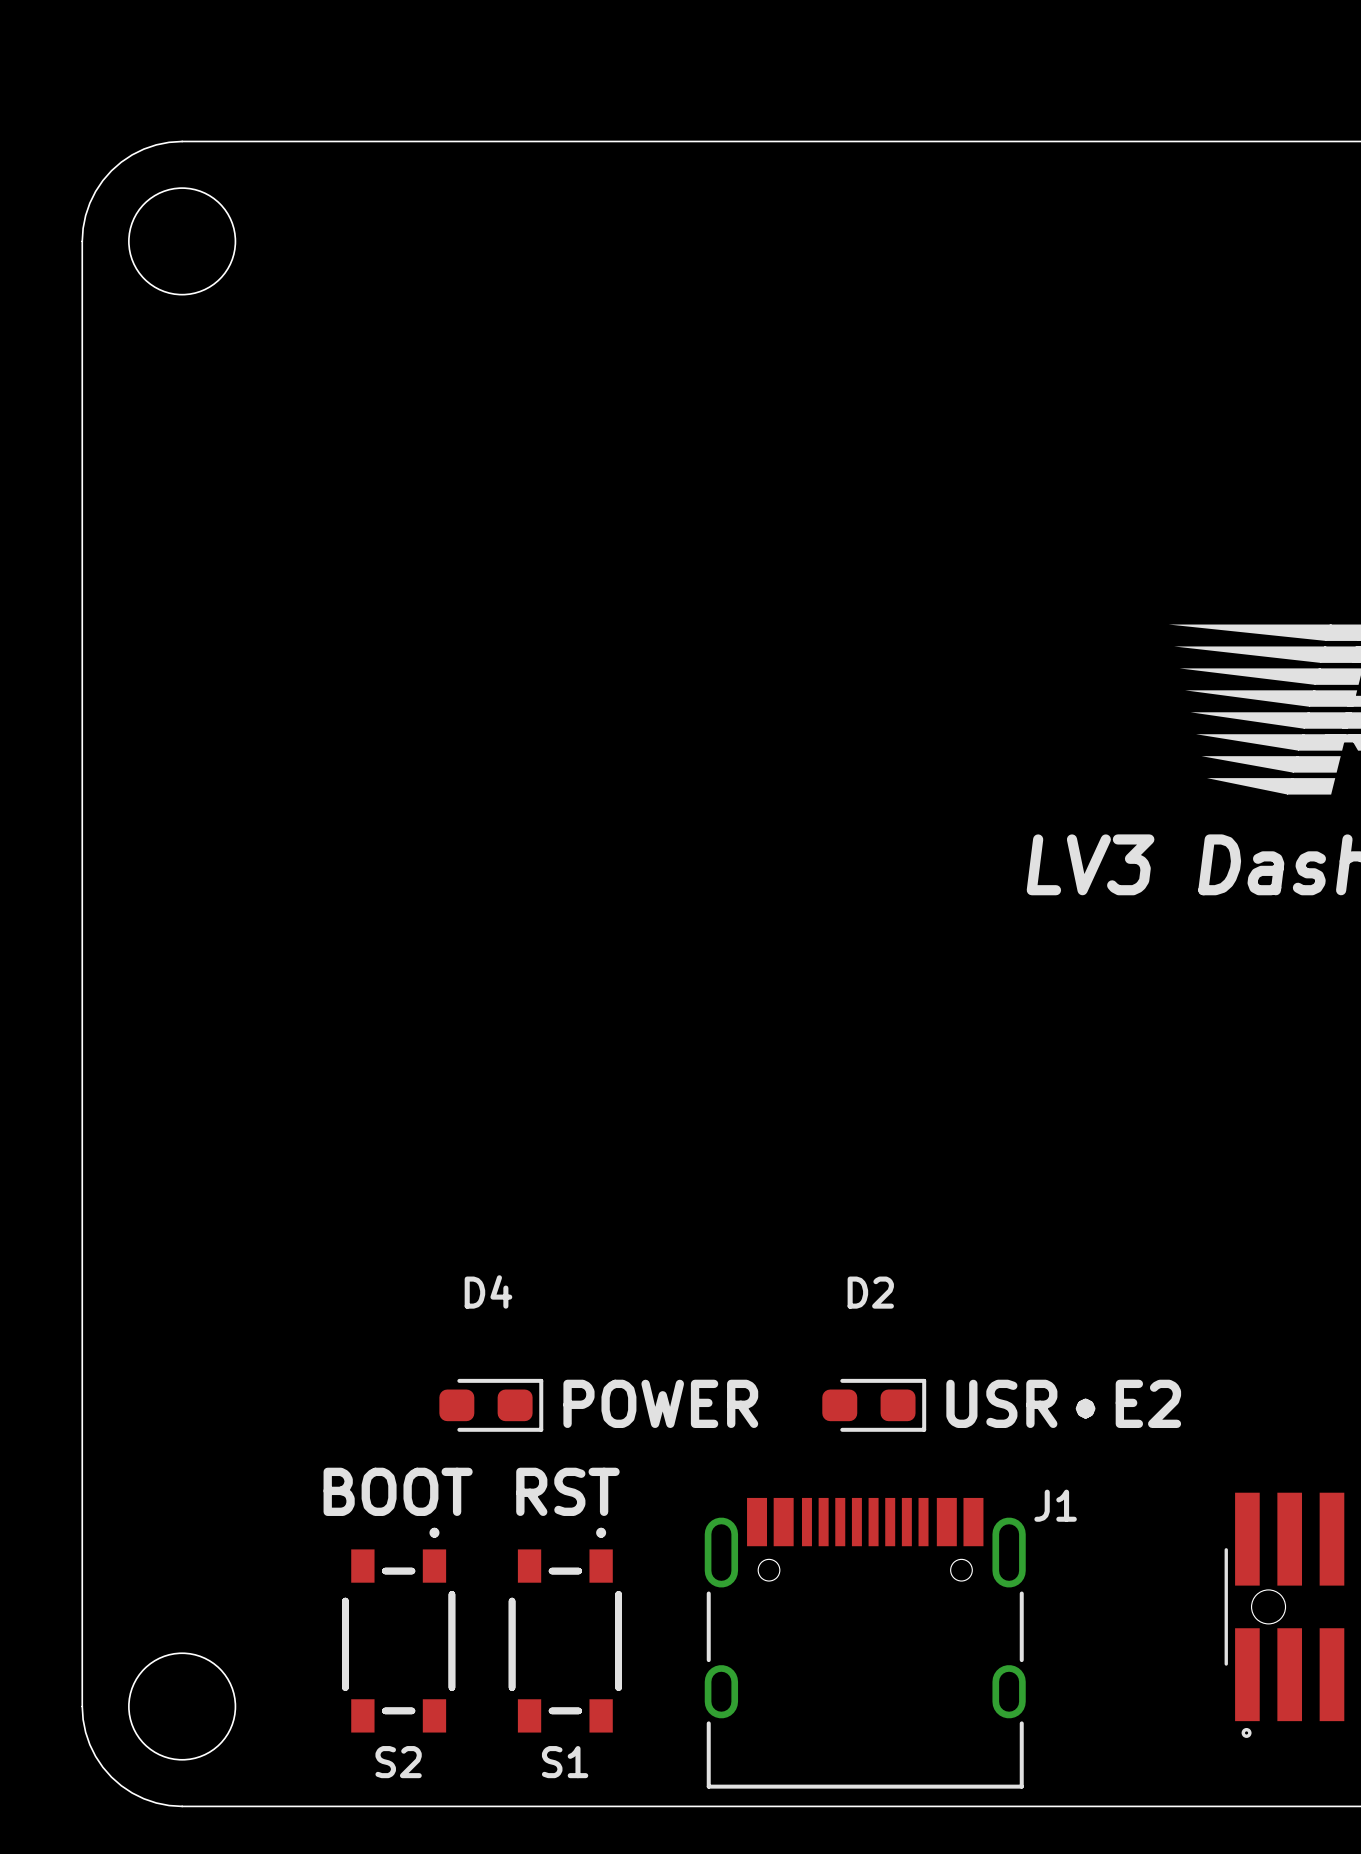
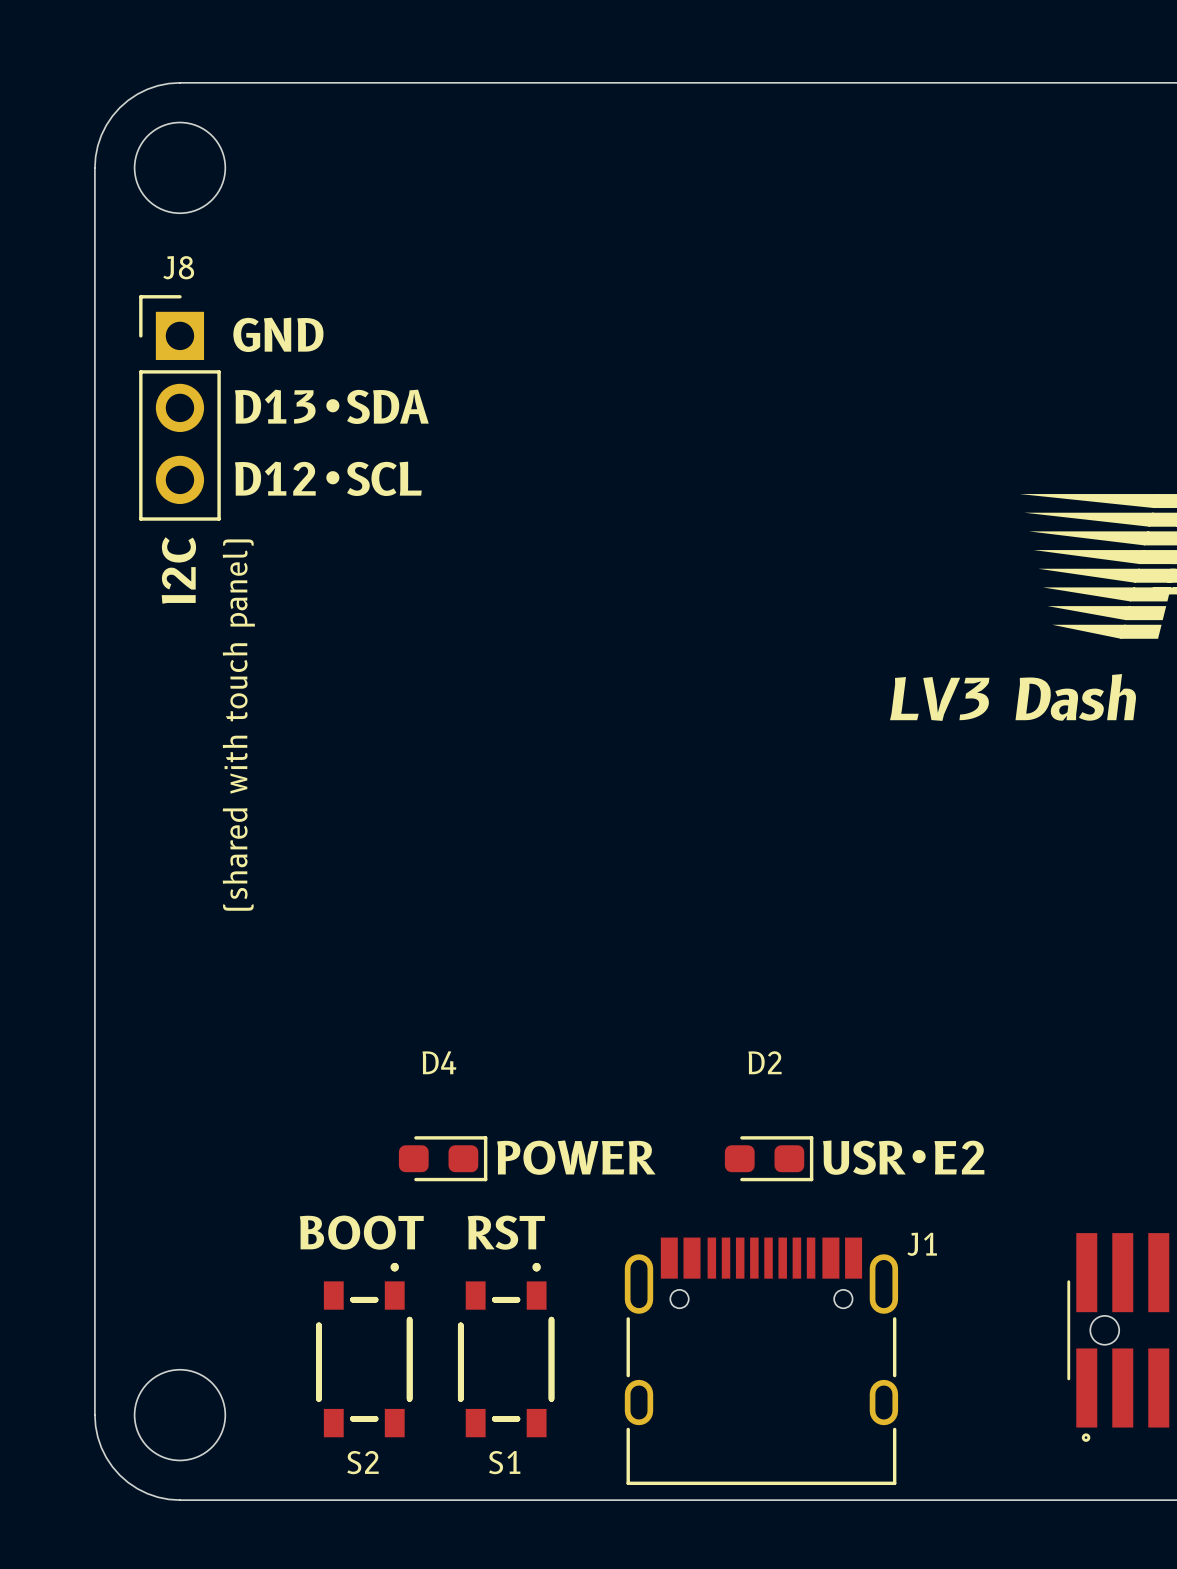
text: none -> GND (278, 334)
text: none -> D13•SDA (331, 406)
J8: none -> (179, 407)
text: none -> D12•SCL (328, 478)
text: none -> I2C (178, 570)
text: none -> (shared with touch panel) (238, 725)

